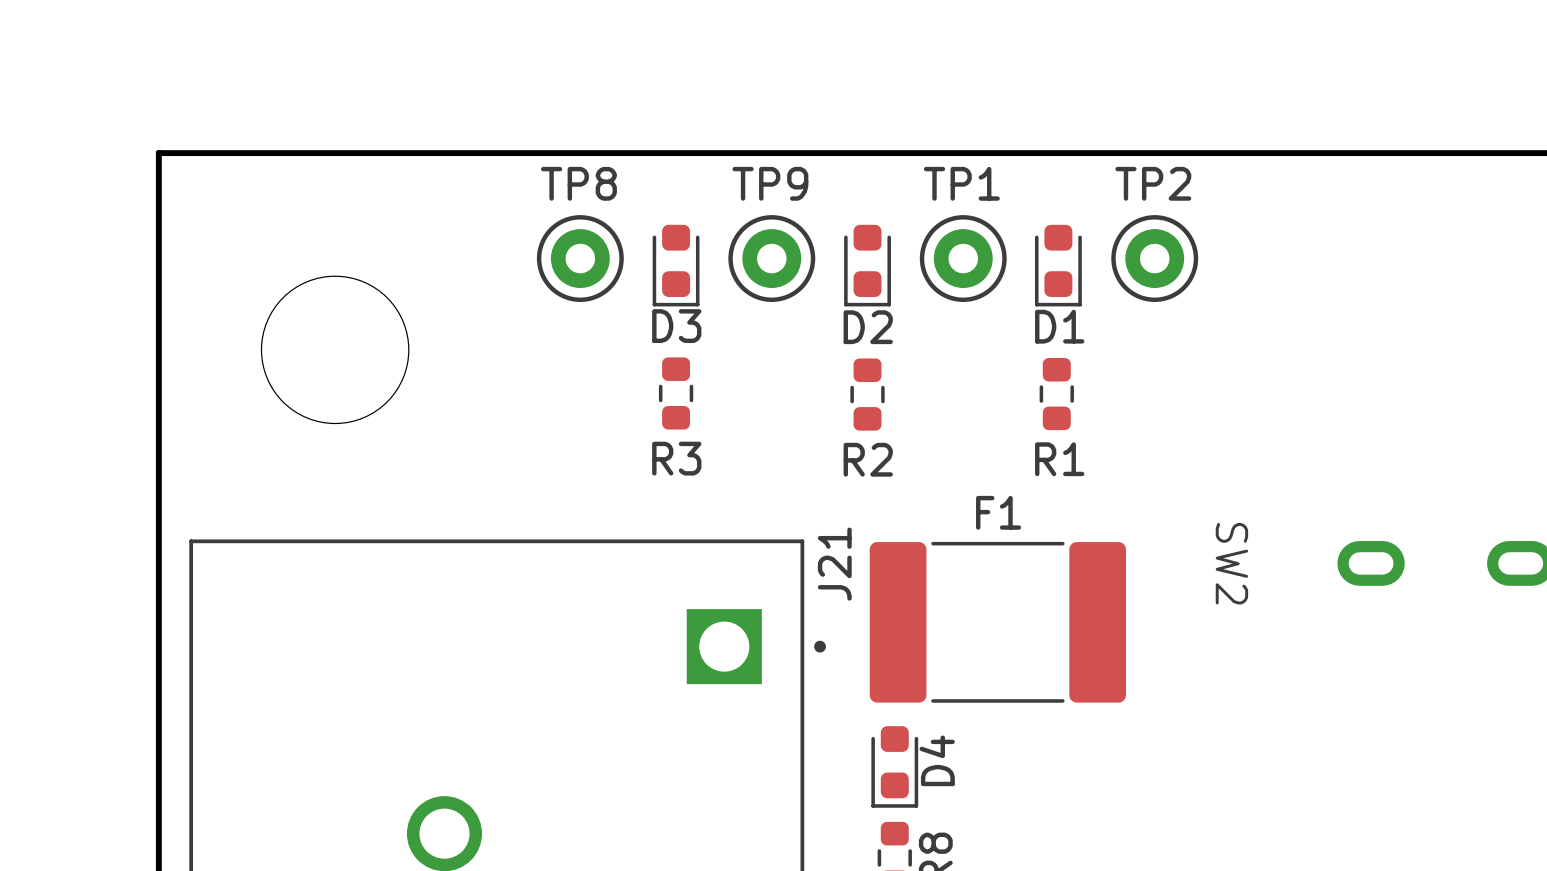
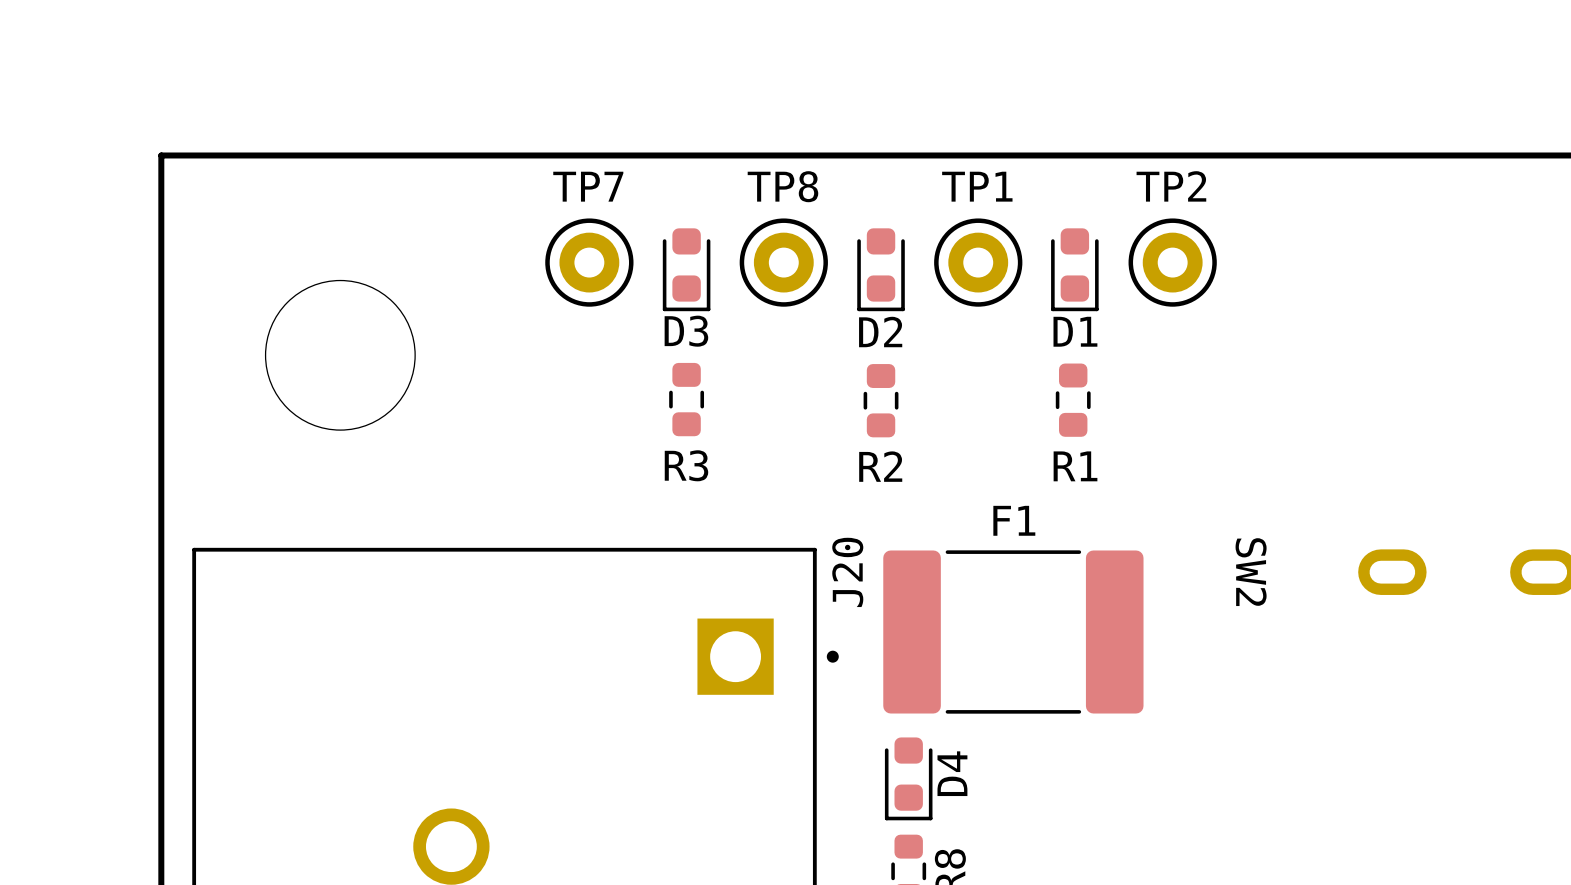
TP8 name: TP8 (578, 183) -> TP7 (588, 186)
TP9 name: TP9 (770, 183) -> TP8 (782, 186)
J21 name: J21 (834, 564) -> J20 (847, 572)

